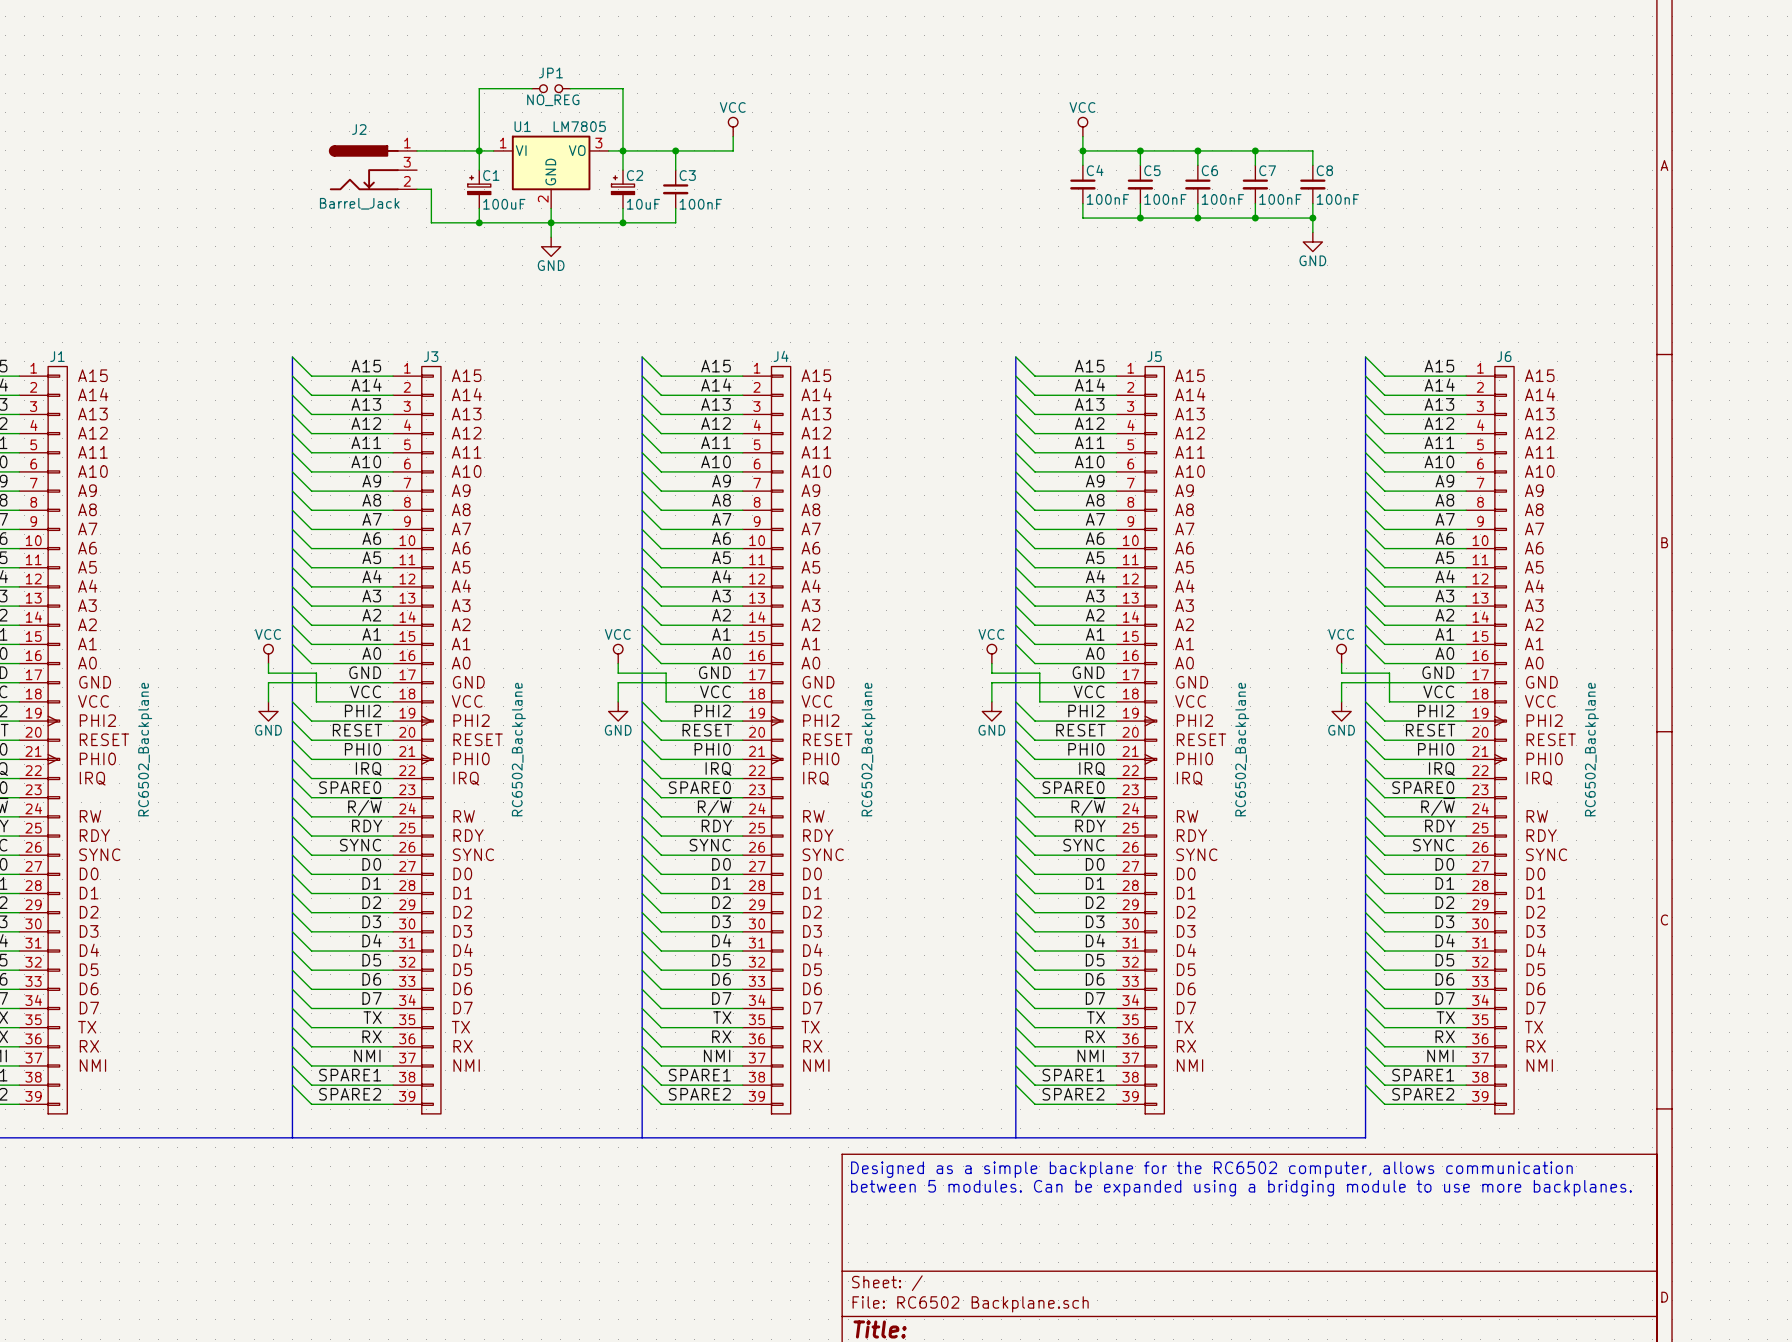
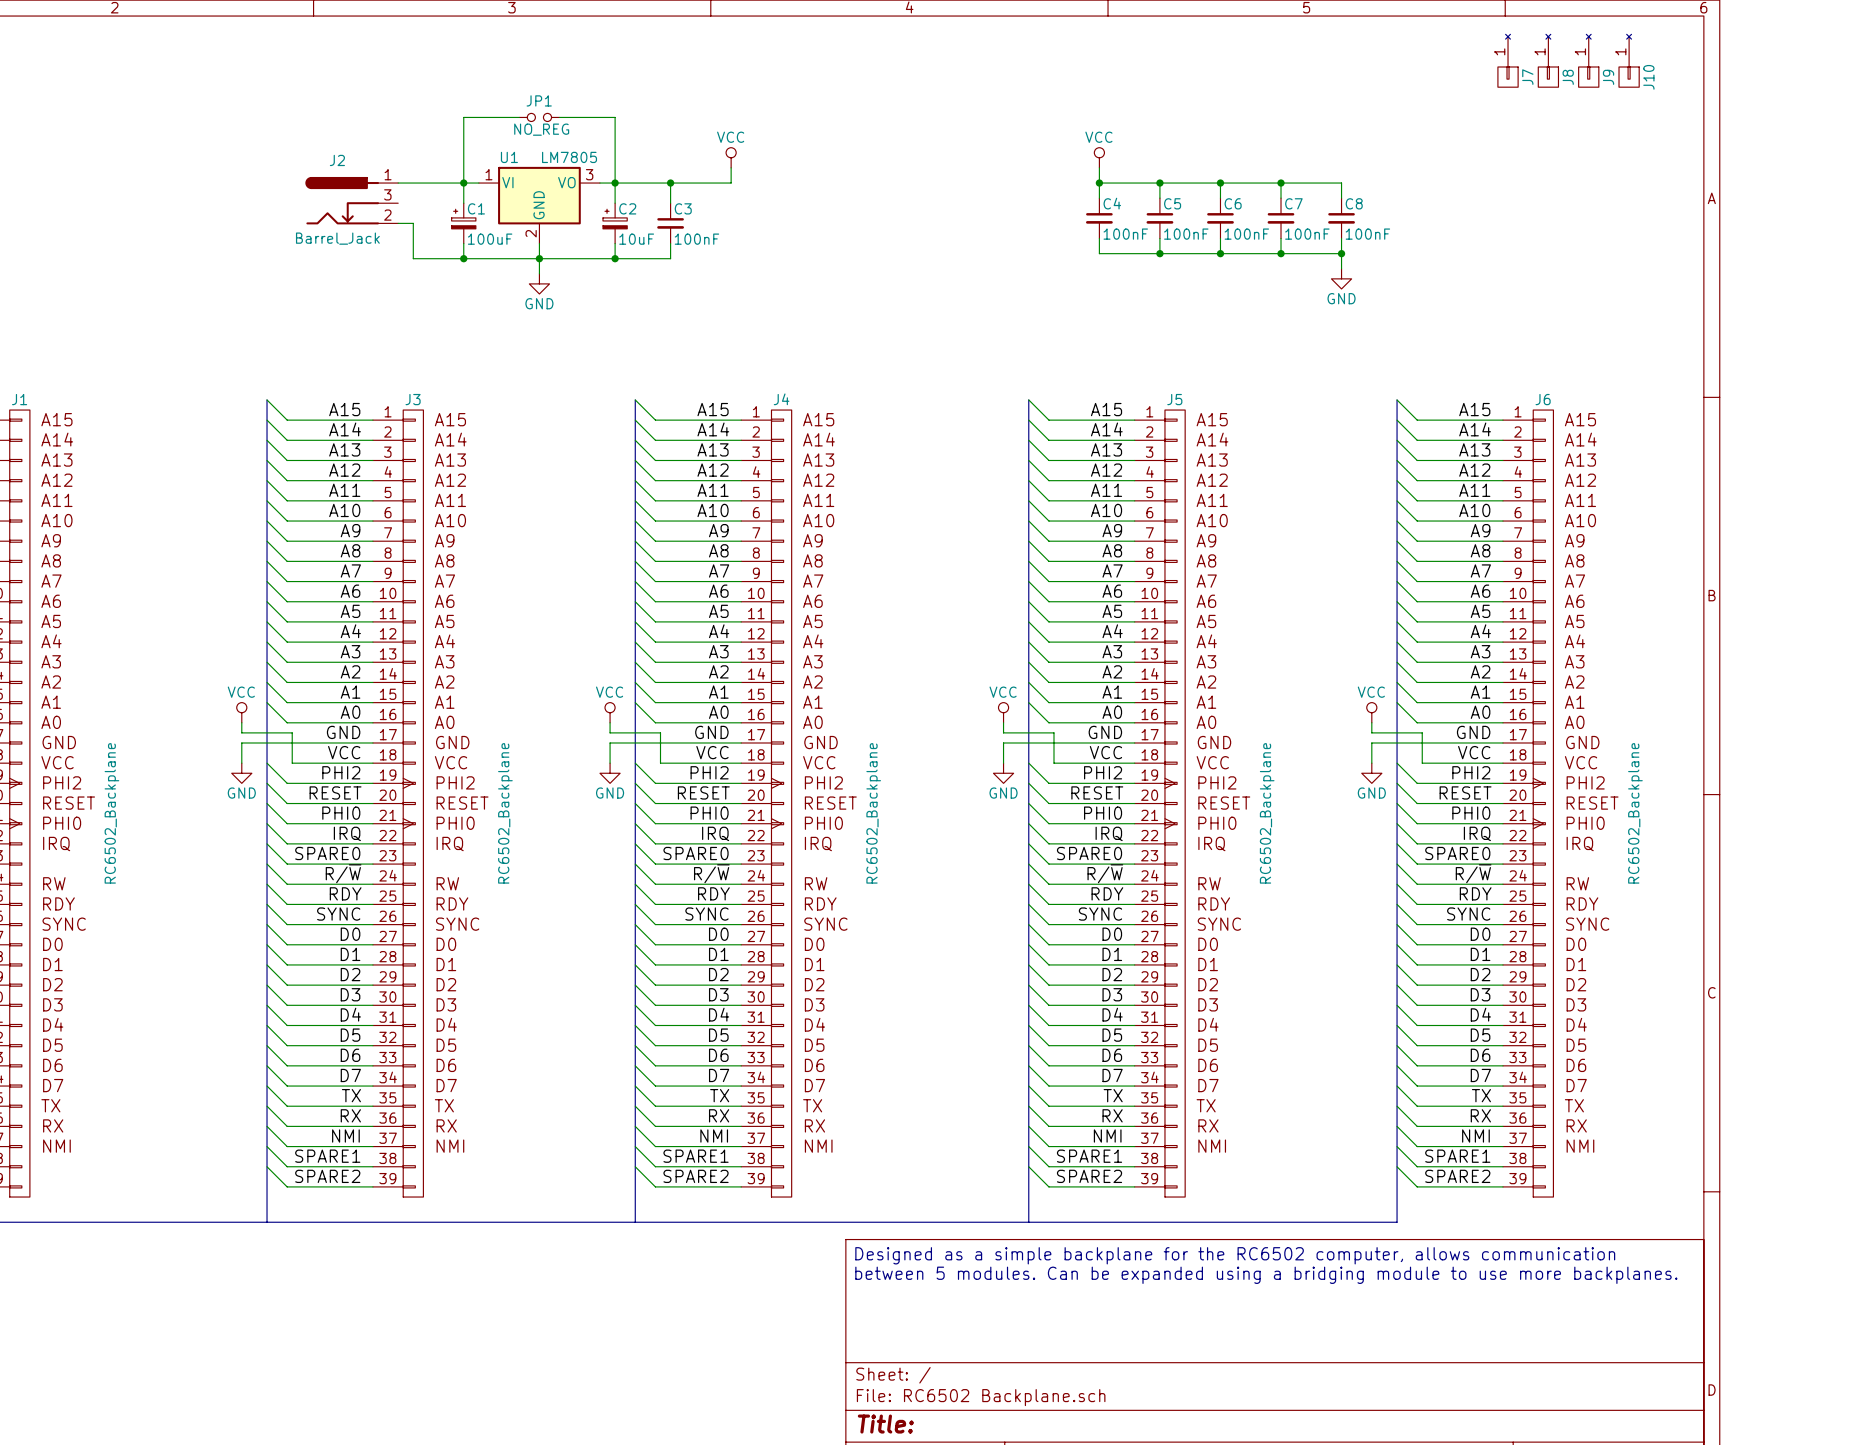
J7: none -> (1508, 60)
J8: none -> (1548, 60)
J9: none -> (1588, 60)
J10: none -> (1629, 60)

